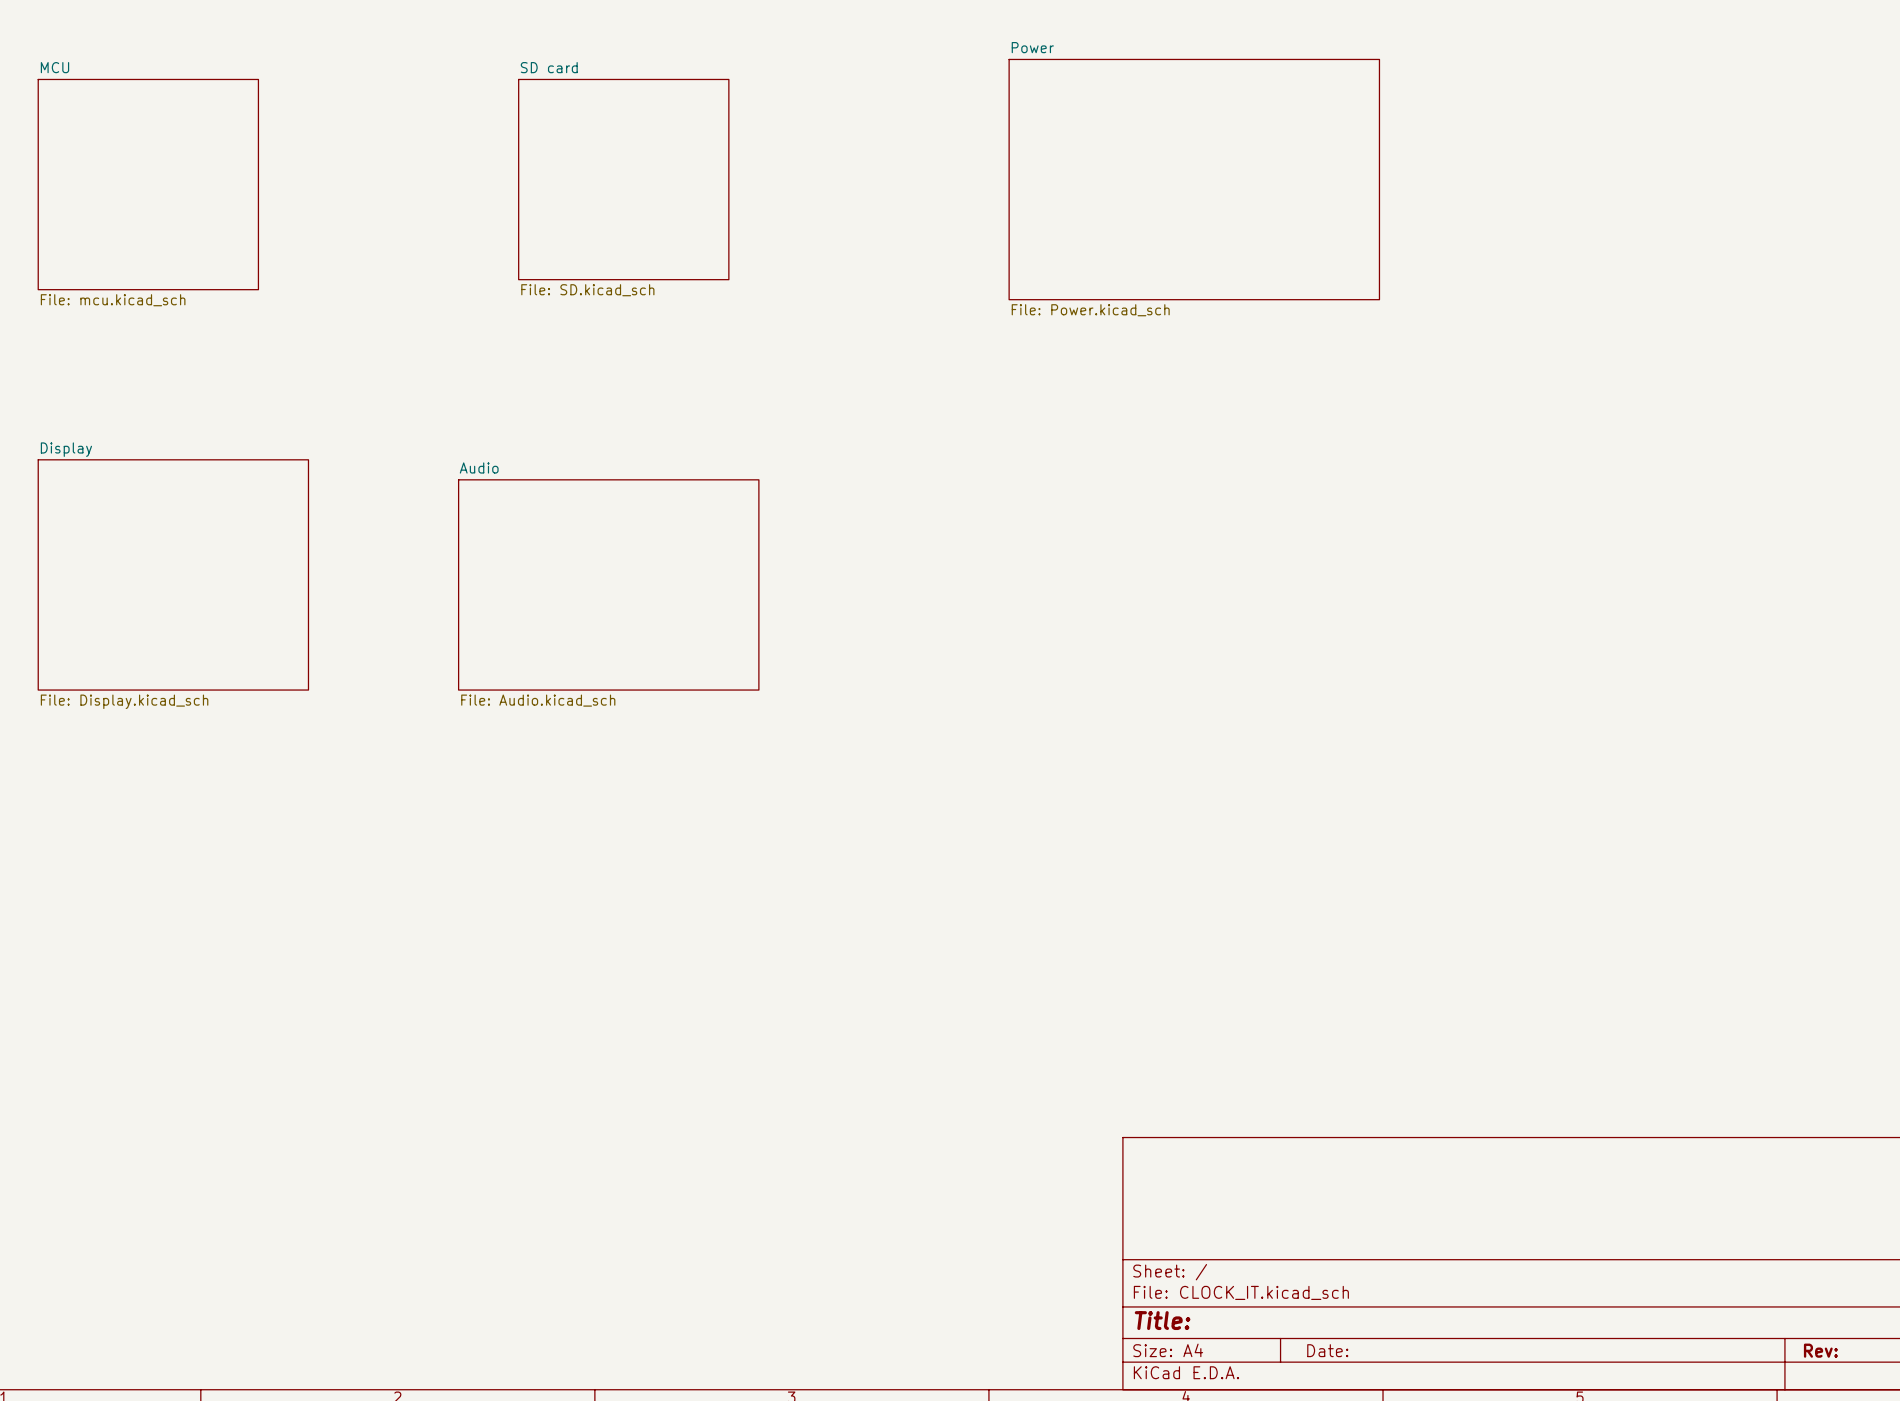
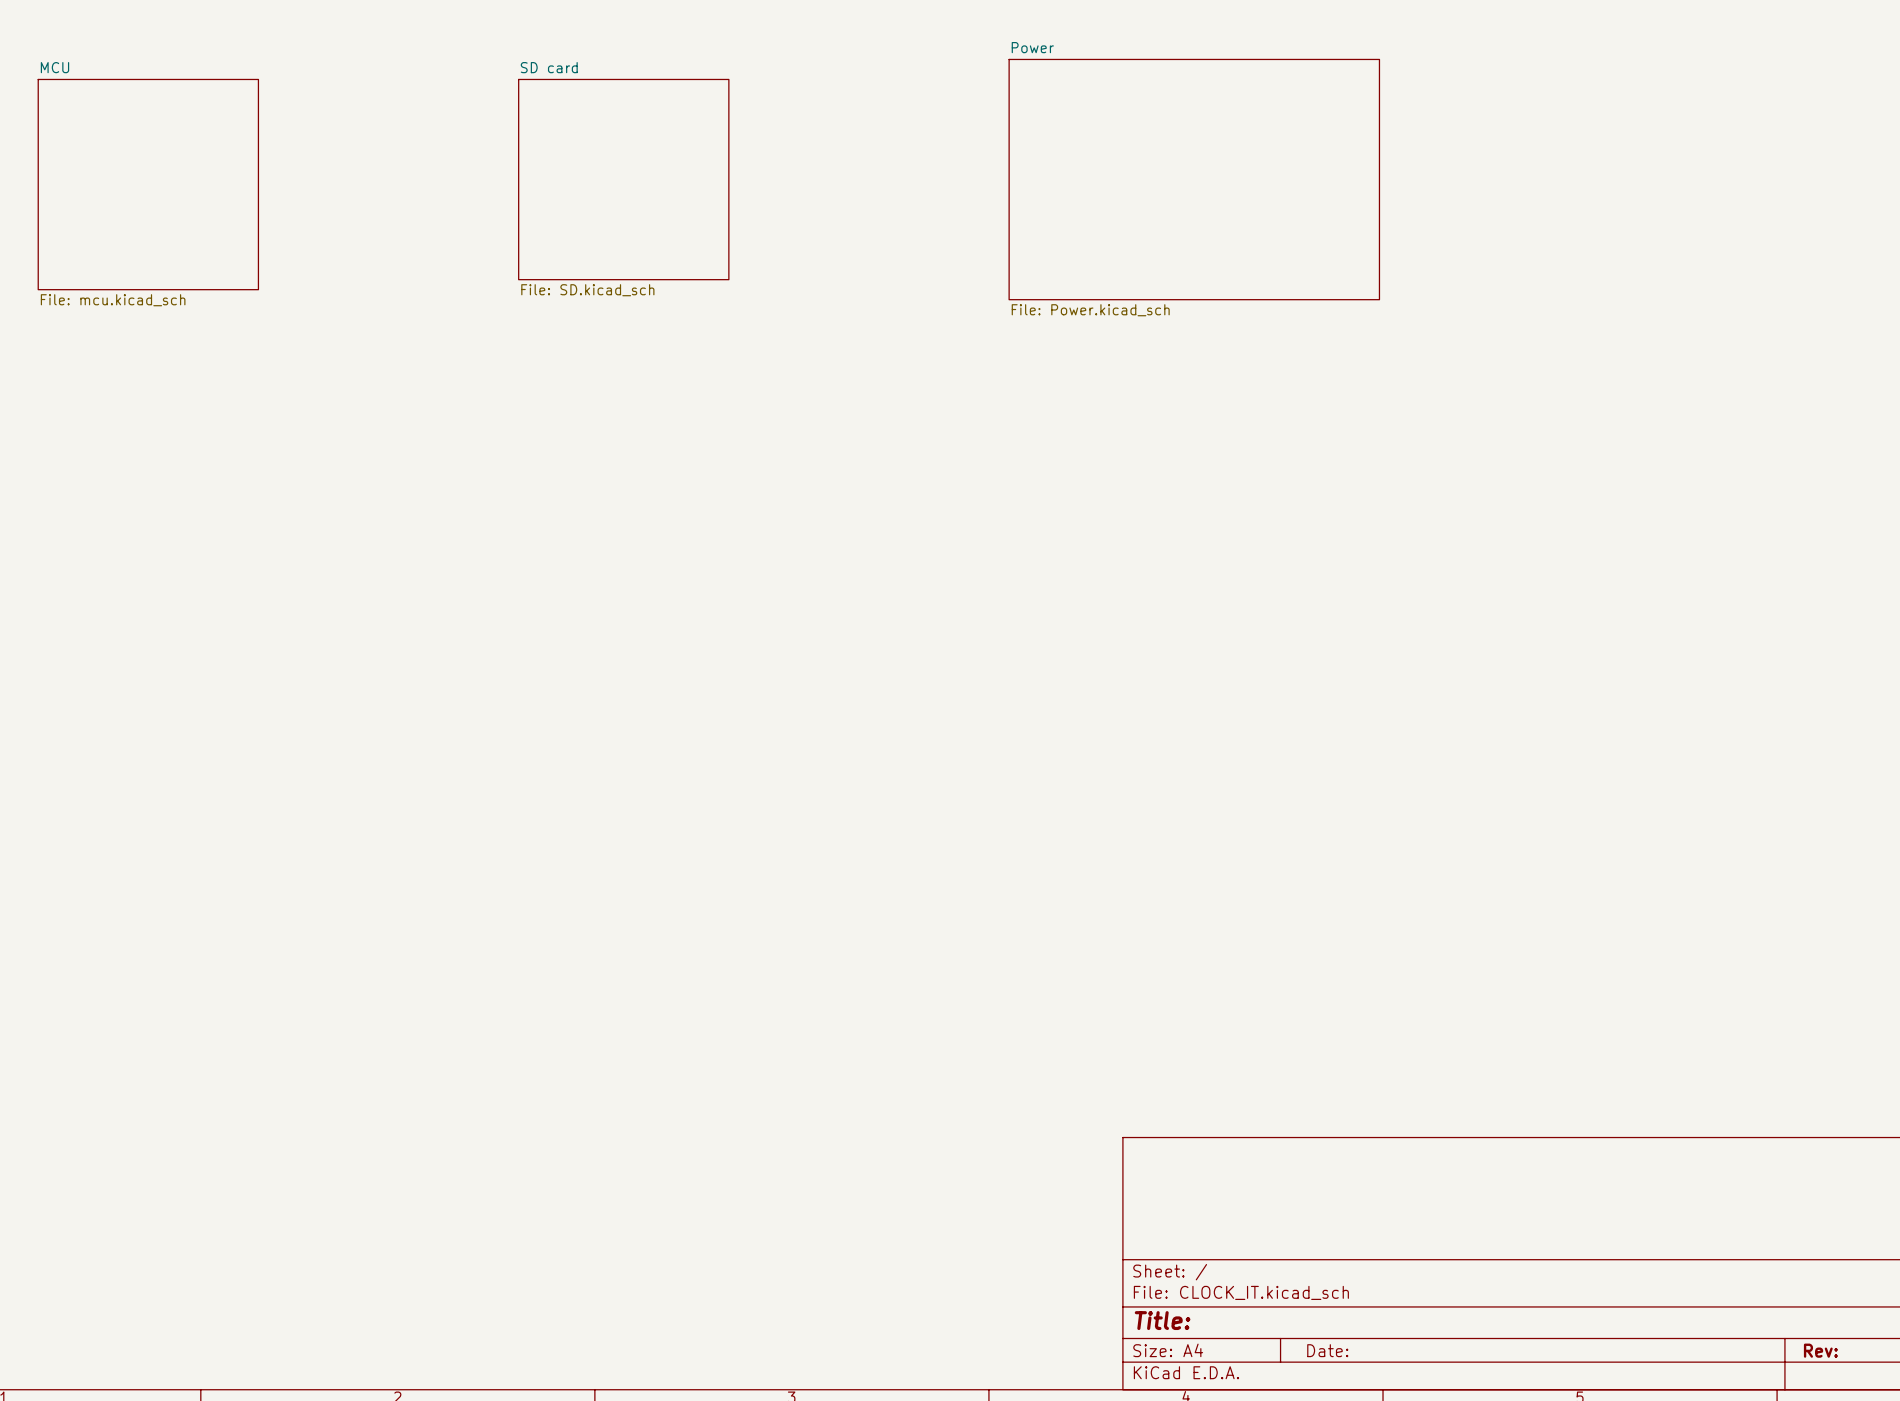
sheet Display: File: Display.kicad_sch (173, 574) -> none
sheet Audio: File: Audio.kicad_sch (608, 584) -> none

